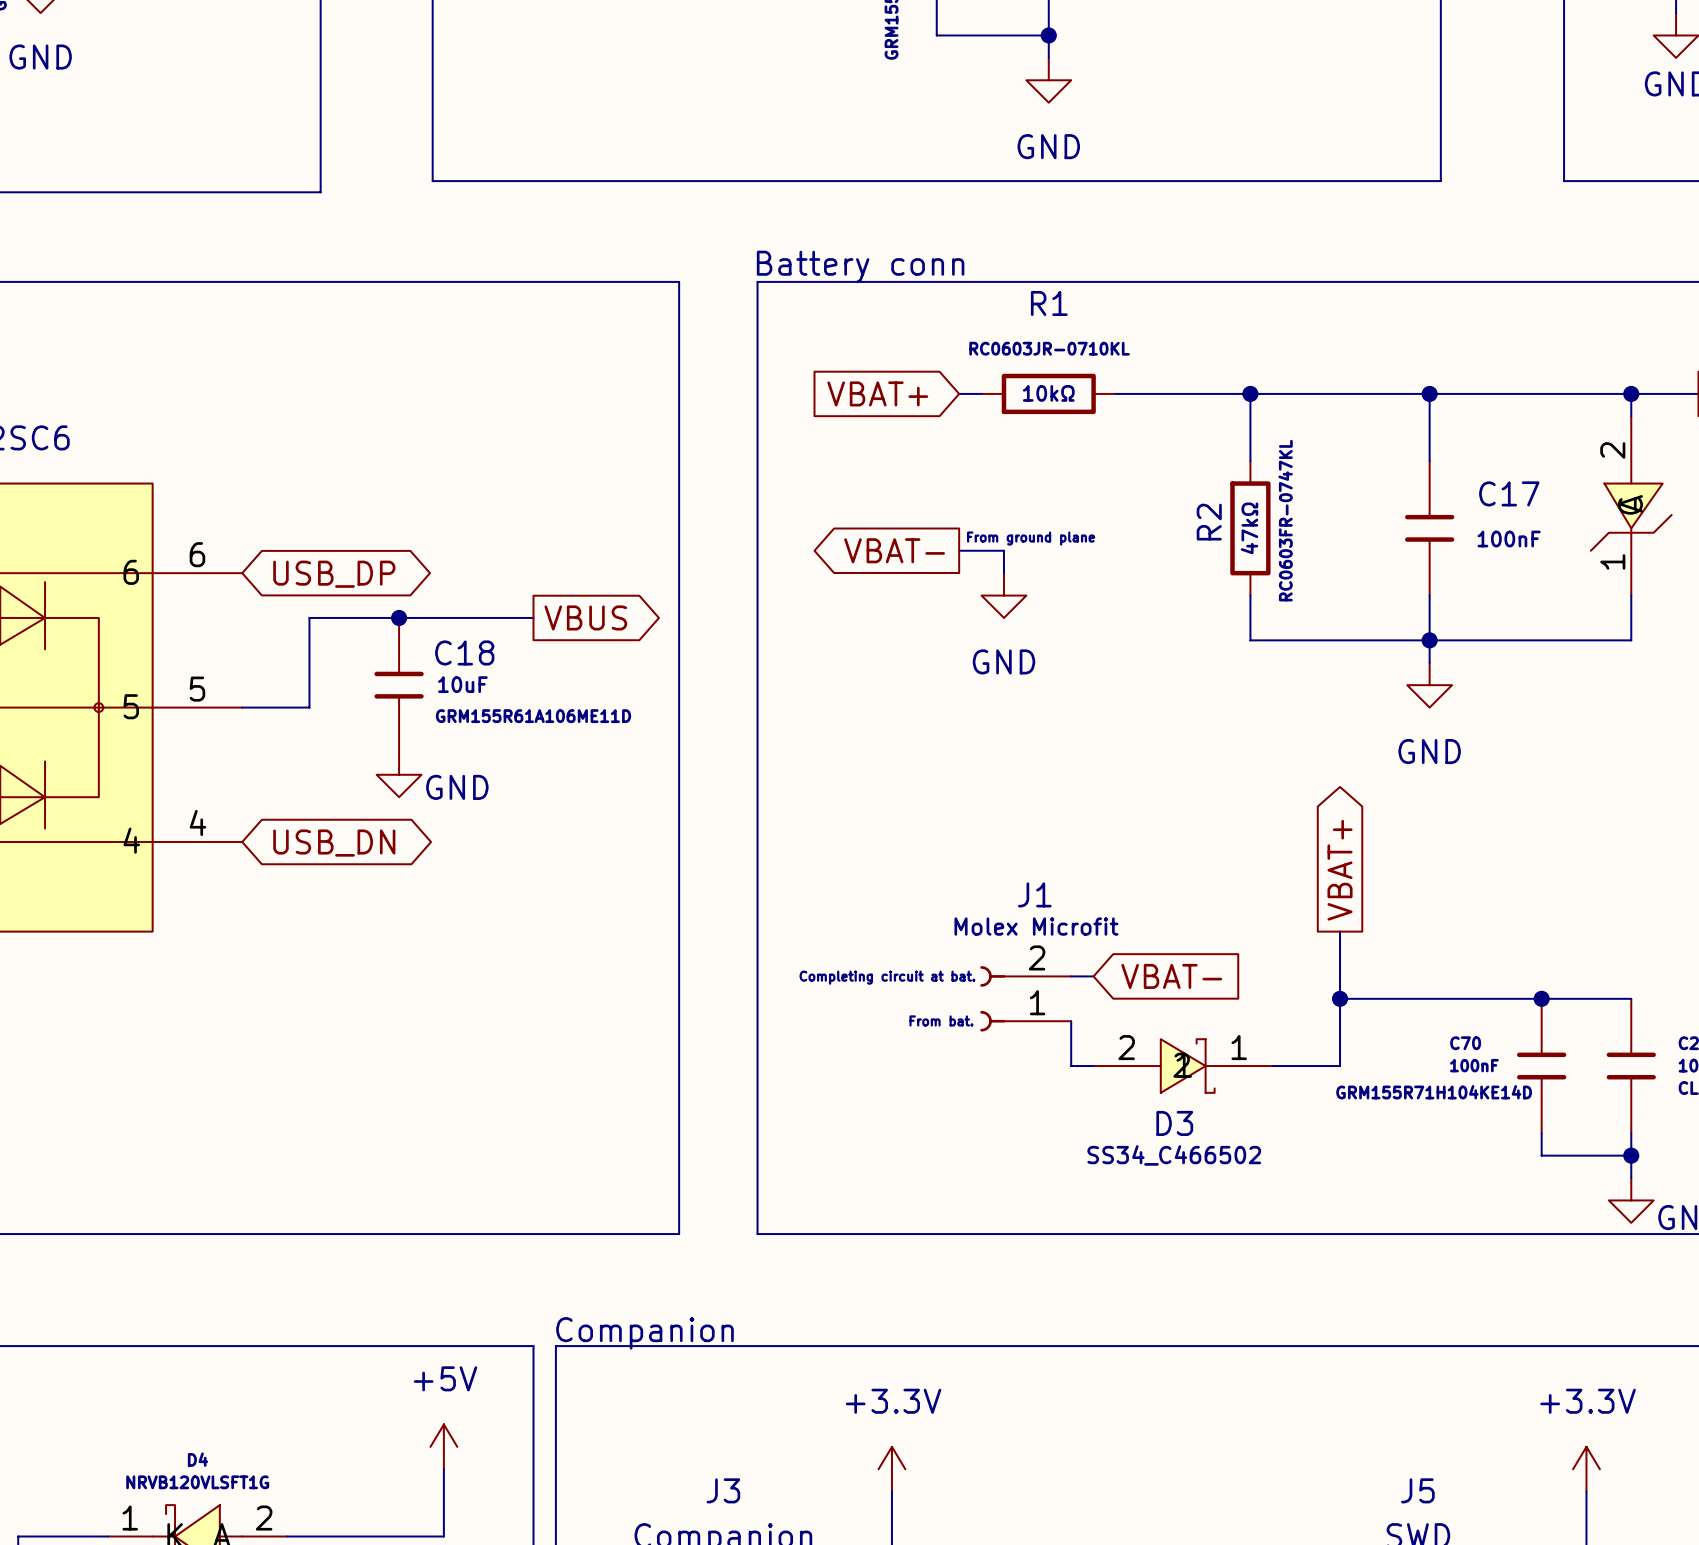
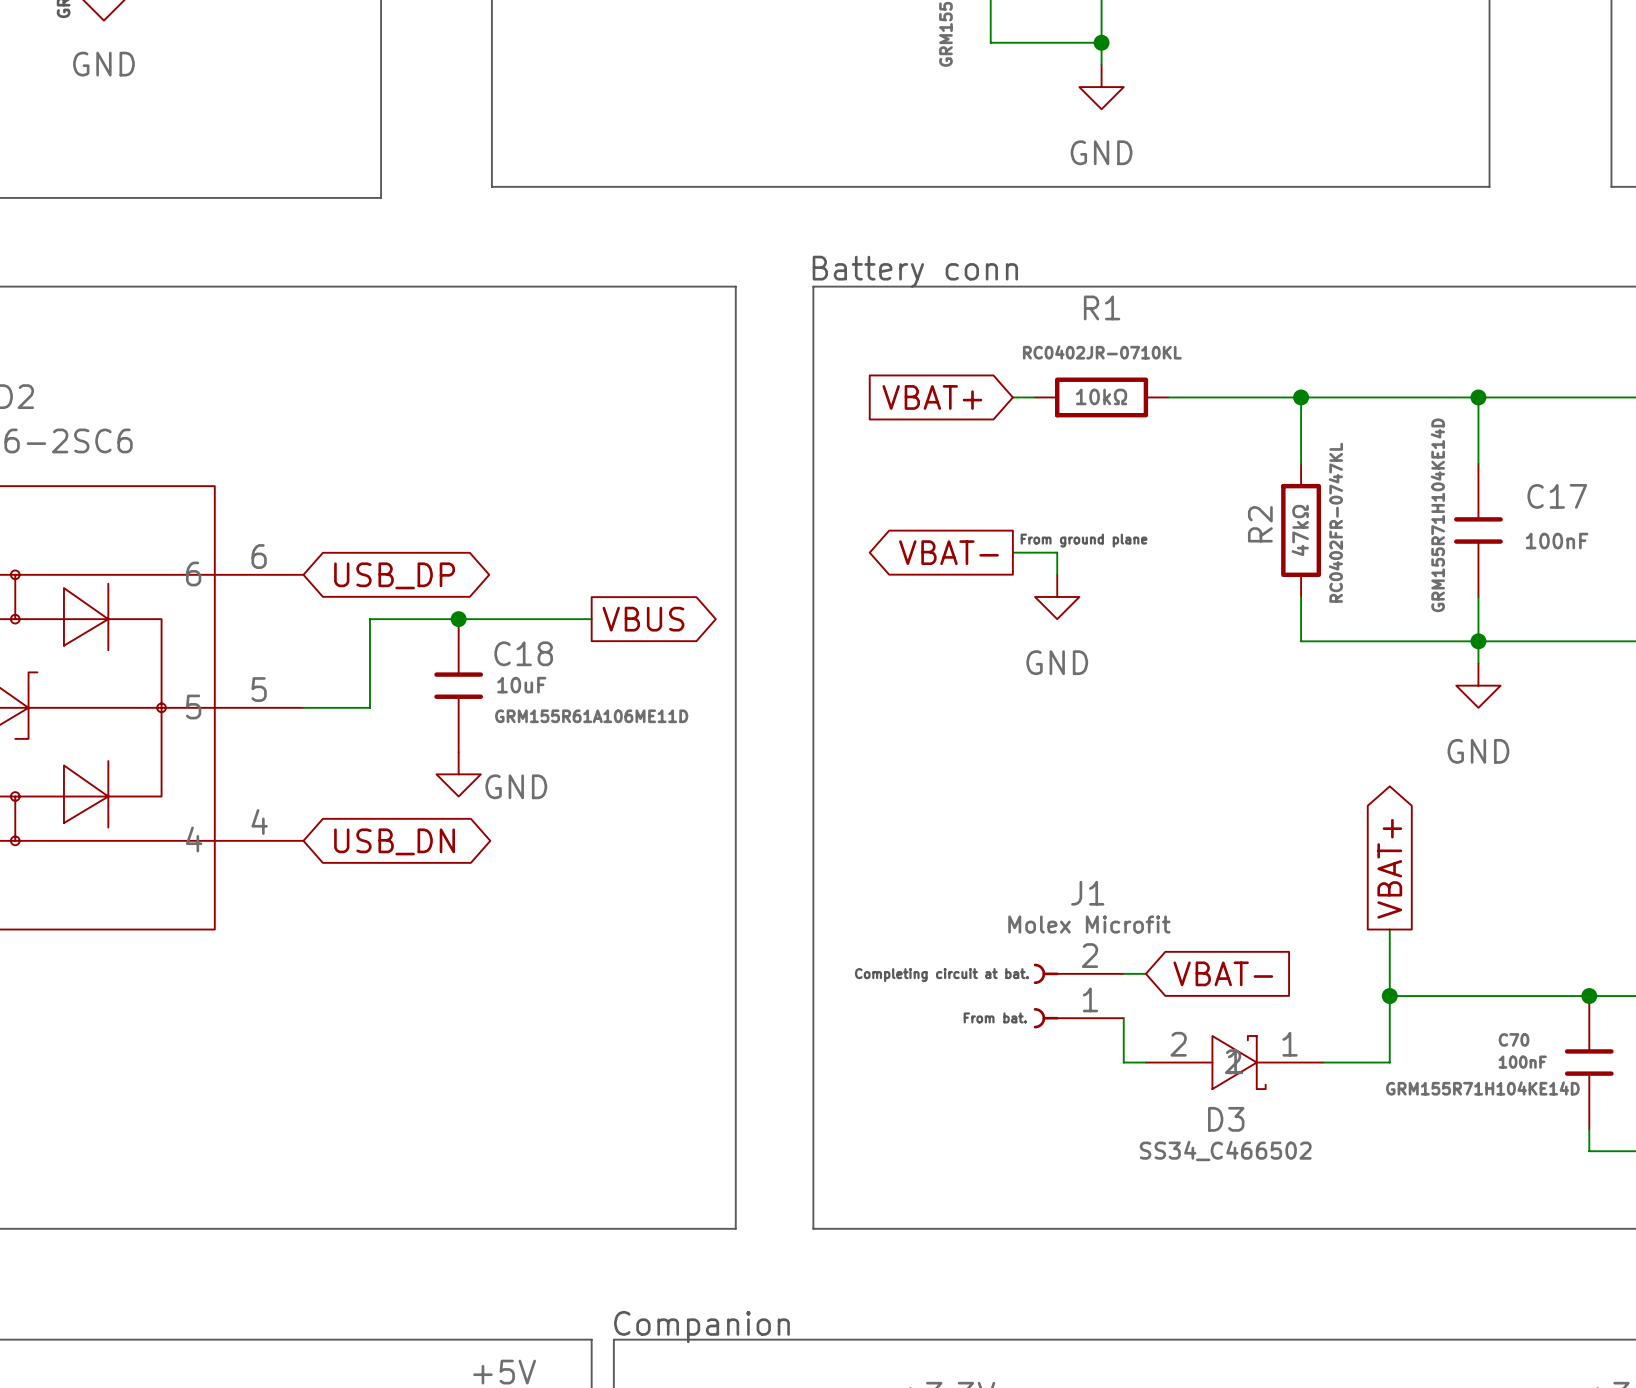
R1 text: RC0603JR-0710KL (1049, 348) -> RC0402JR-0710KL (1102, 352)
C17 text: none -> GRM155R71H104KE14D (1437, 515)
R2 text: RC0603FR-0747KL (1285, 520) -> RC0402FR-0747KL (1335, 522)

